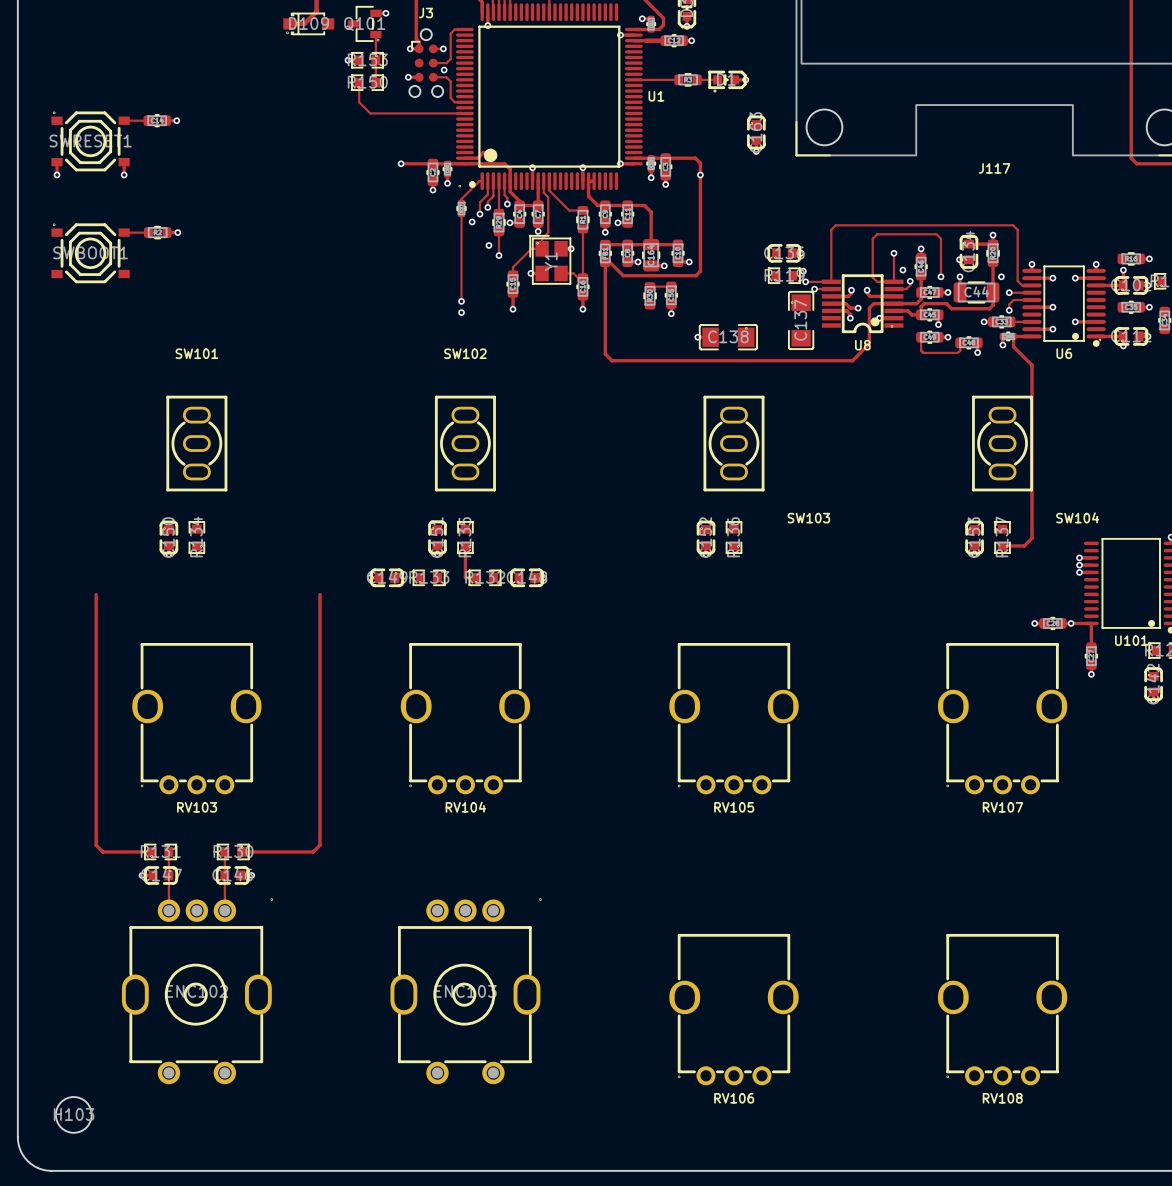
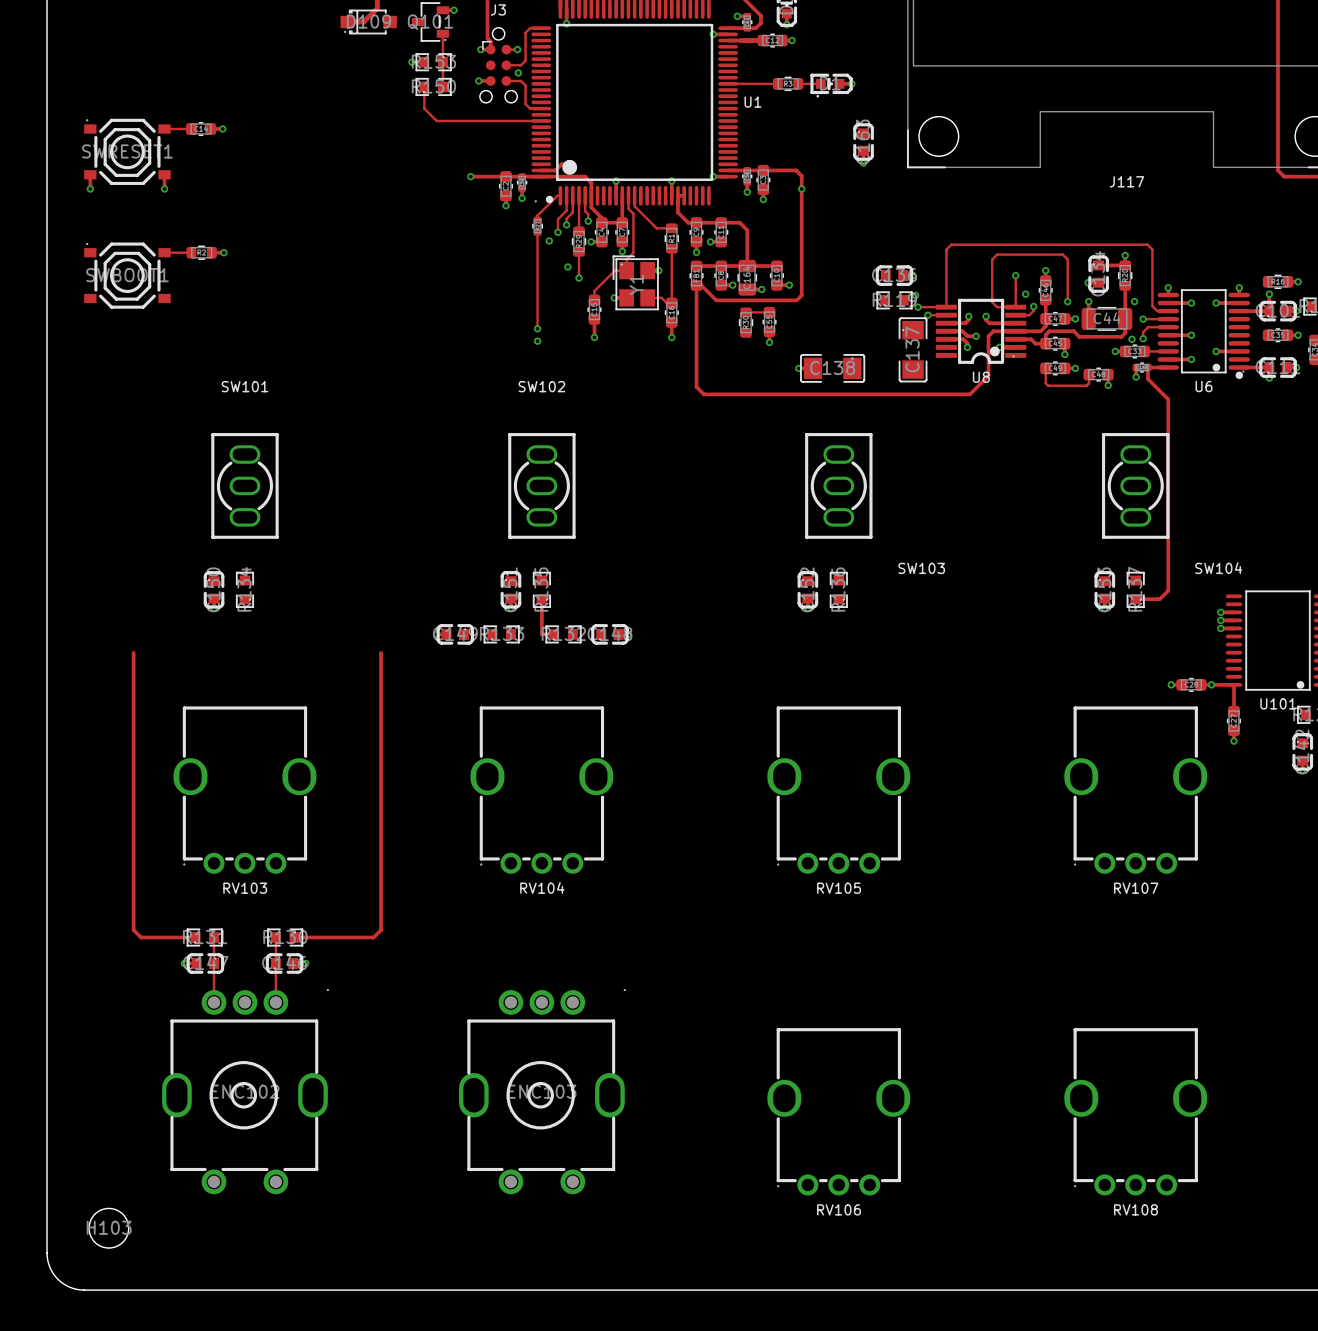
via: none -> (1132, 339)

